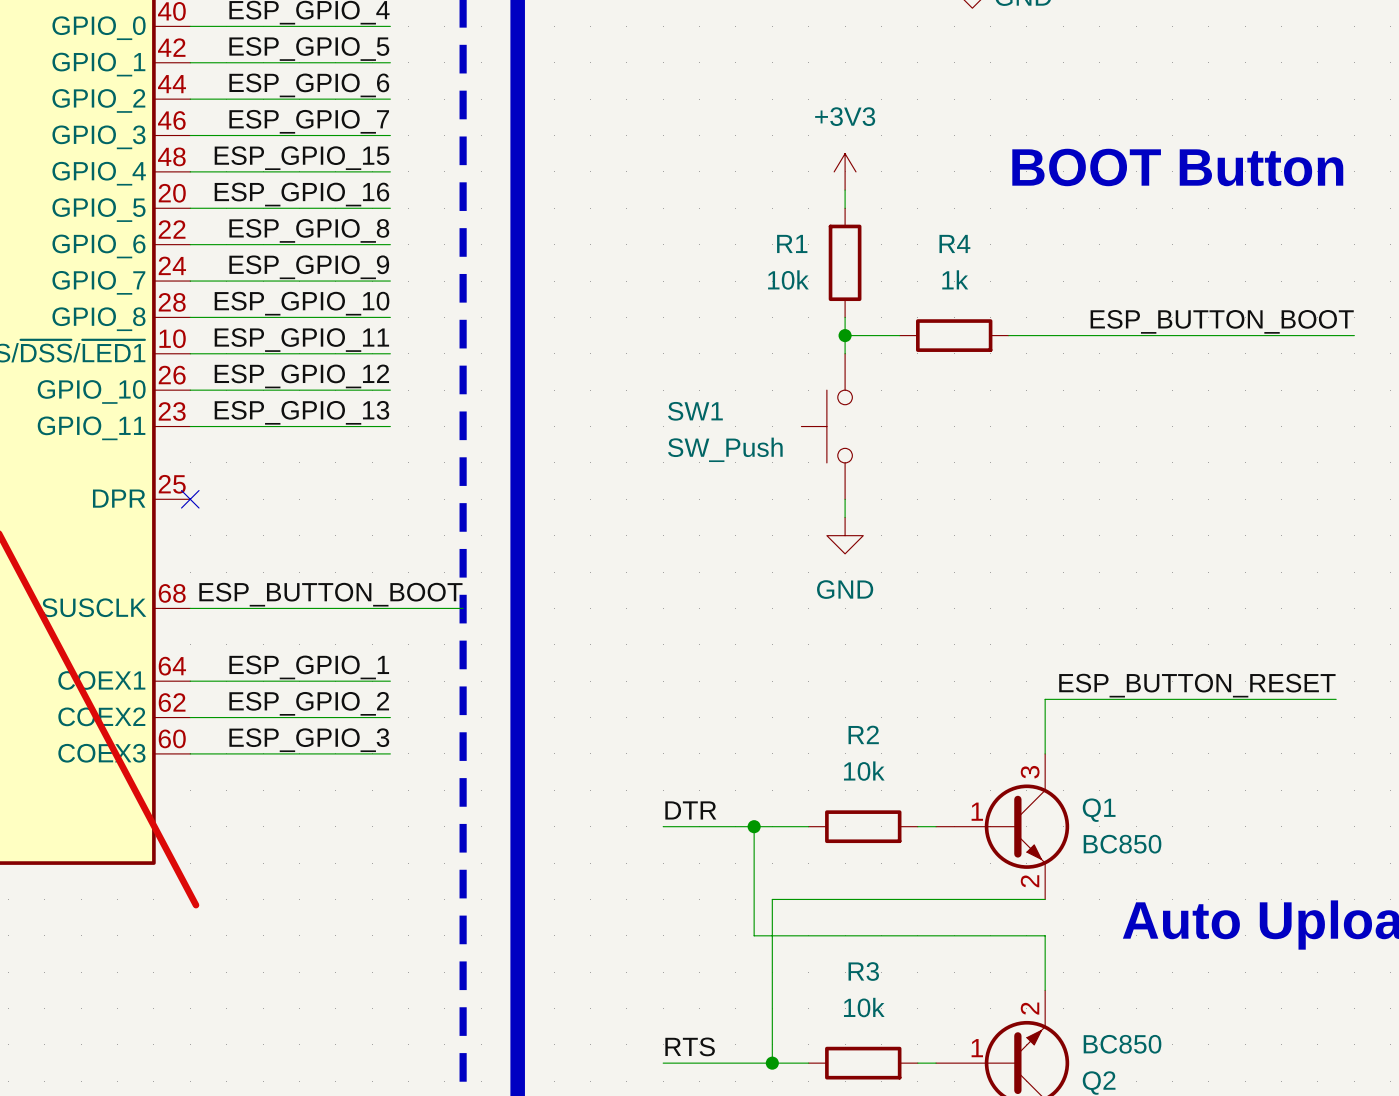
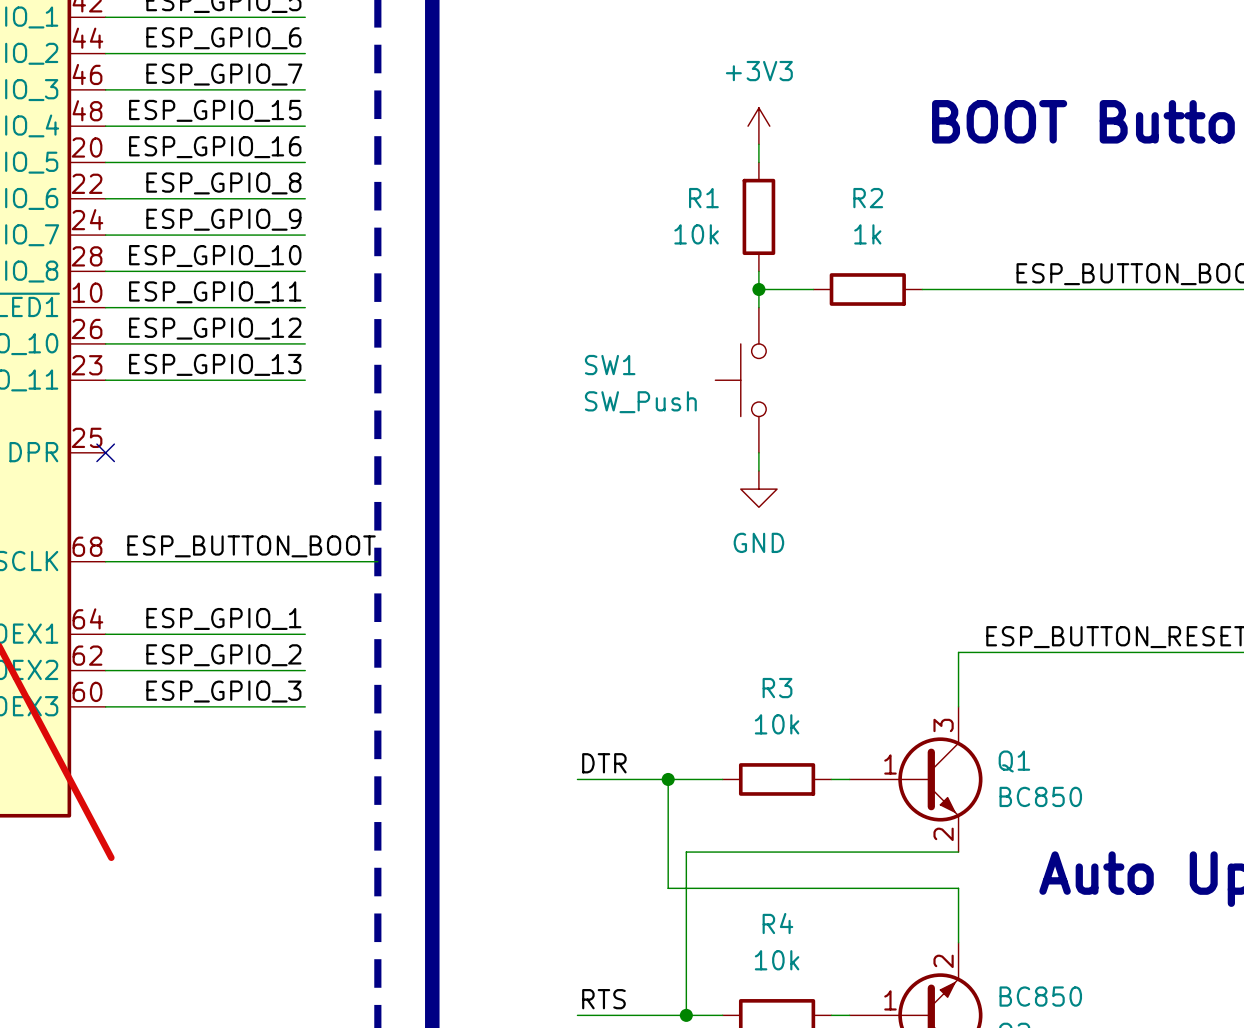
R4 name: R4 (954, 243) -> R2 (868, 198)
R2 name: R2 (863, 734) -> R3 (777, 688)
R3 name: R3 (863, 971) -> R4 (777, 923)

